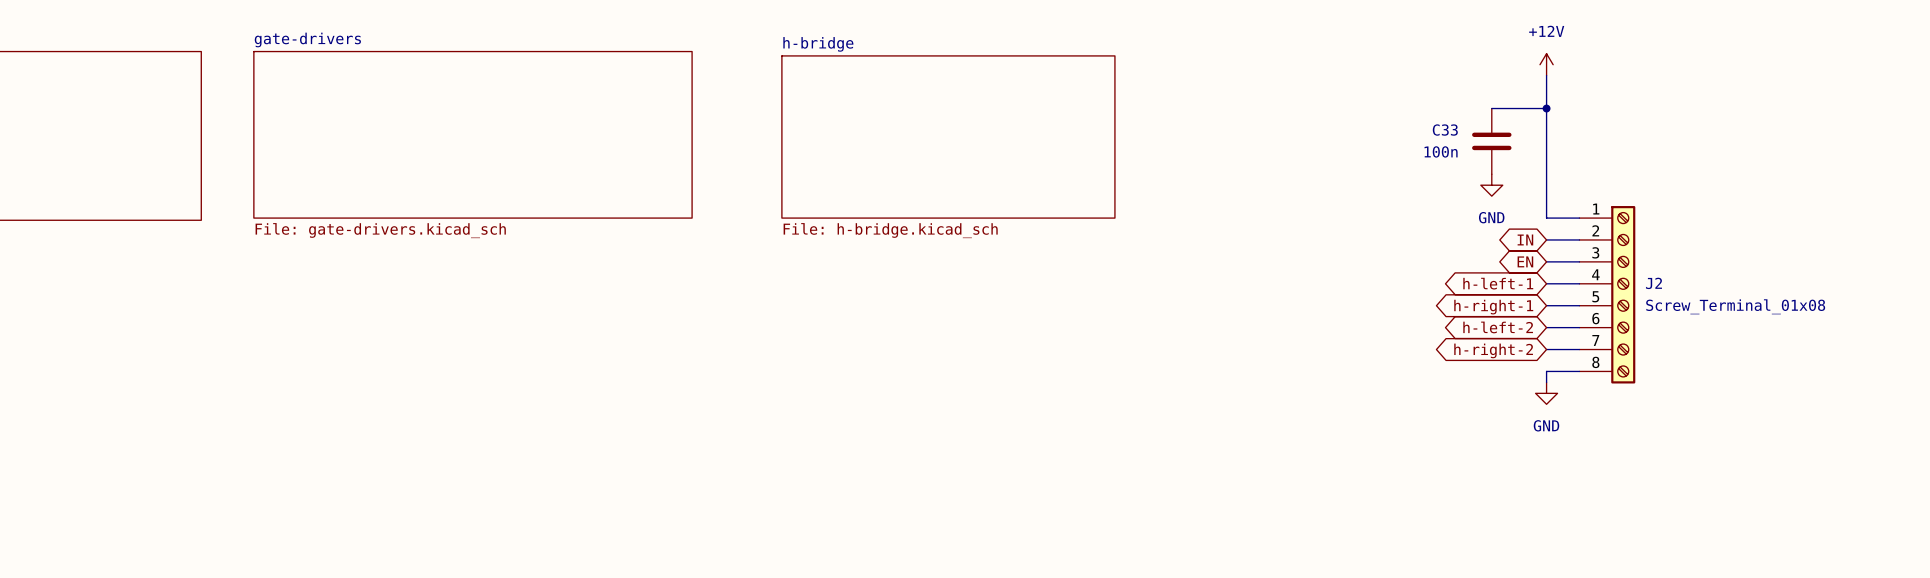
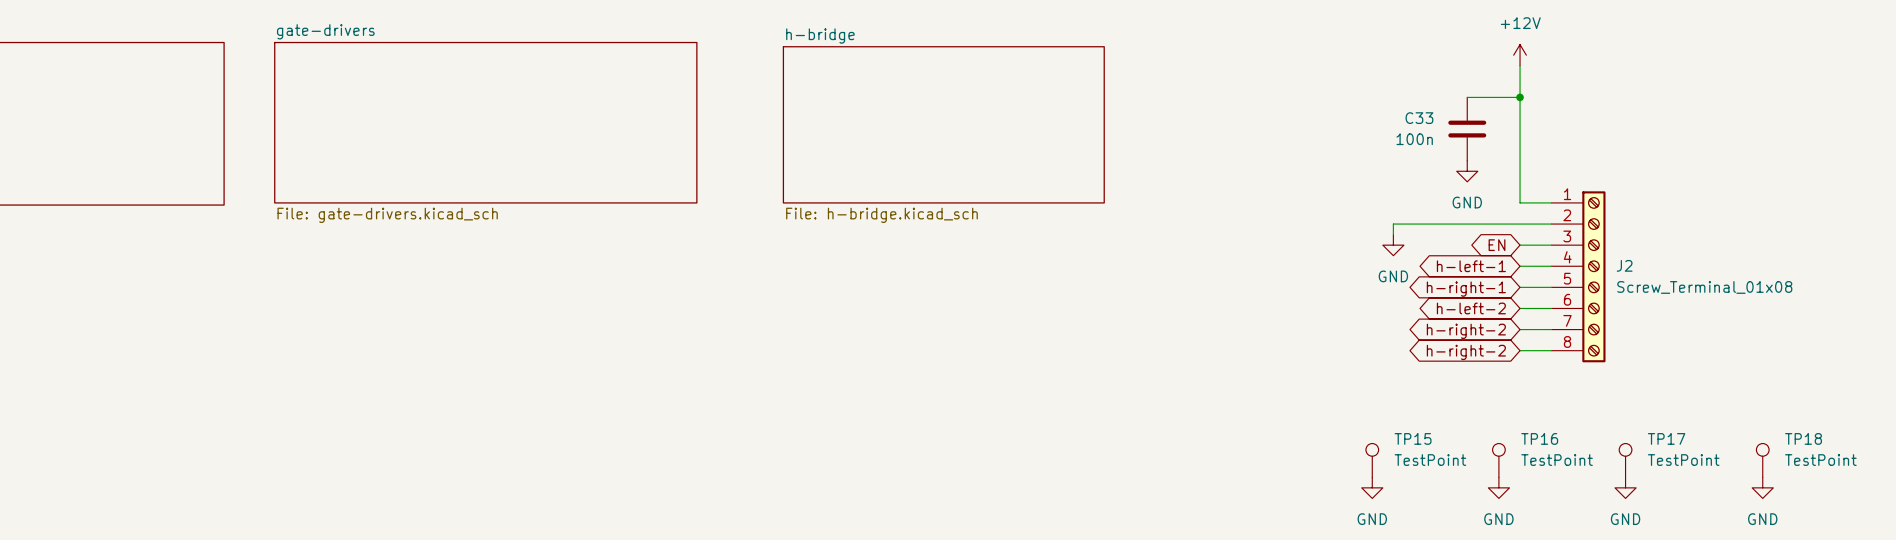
global label: IN (1525, 239) -> none
wire: none -> (1520, 224) (1393, 224) (1393, 234)
power symbol: none -> GND (1393, 245)
wire: (1546, 371) (1546, 382) -> none
global label: none -> h-right-2 (1466, 352)
power symbol: GND (1546, 393) -> none
TP15: none -> TestPoint (1372, 460)
TP16: none -> TestPoint (1498, 460)
TP17: none -> TestPoint (1625, 460)
TP18: none -> TestPoint (1762, 460)
power symbol: none -> GND (1372, 487)
power symbol: none -> GND (1498, 487)
power symbol: none -> GND (1625, 487)
power symbol: none -> GND (1762, 487)

